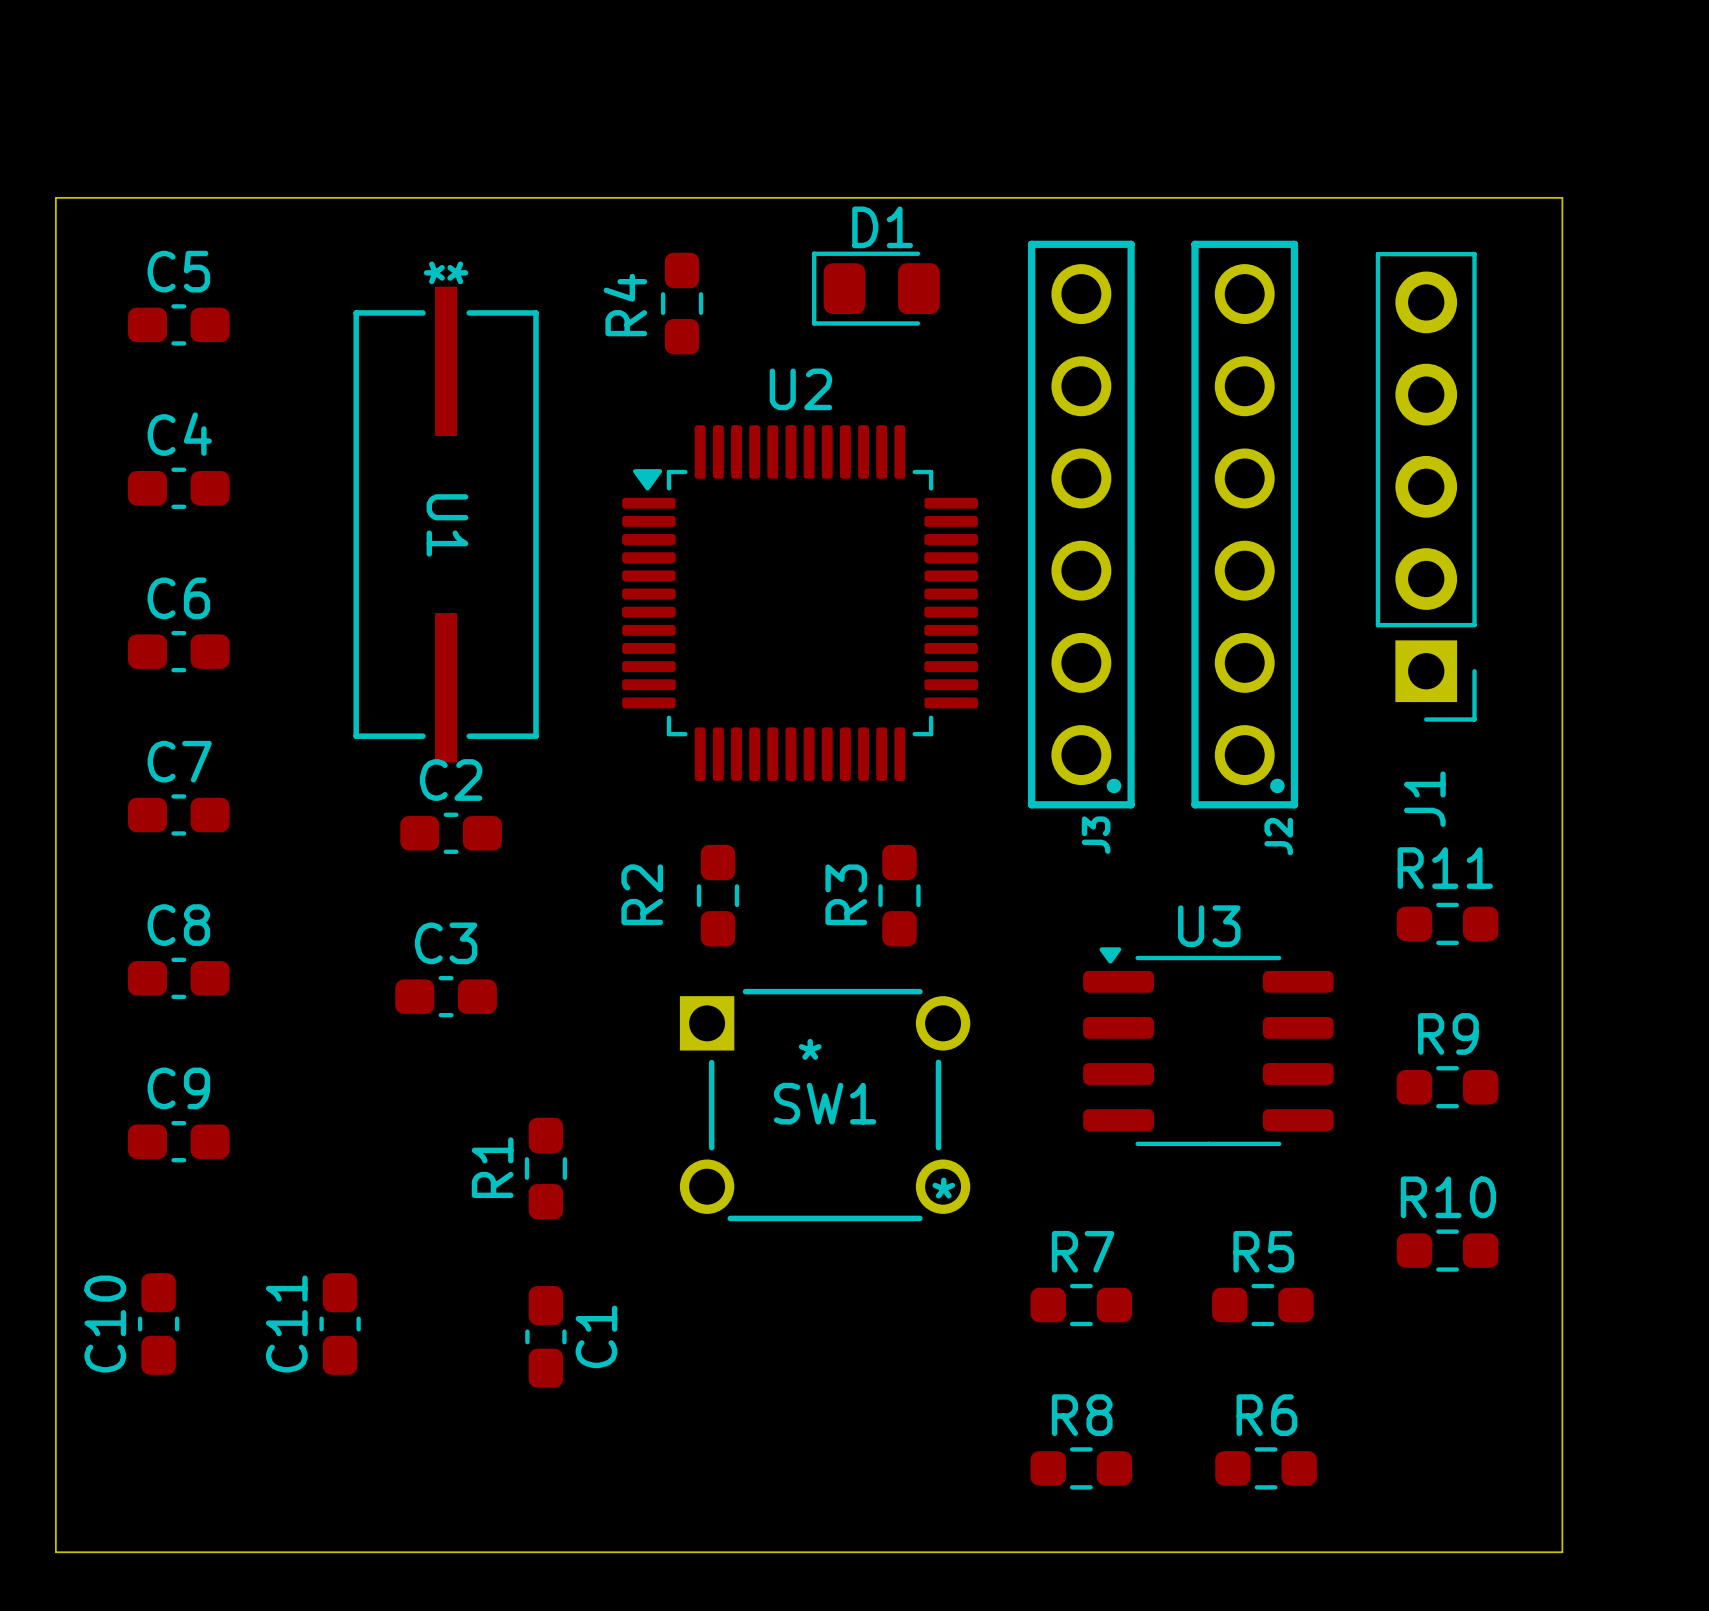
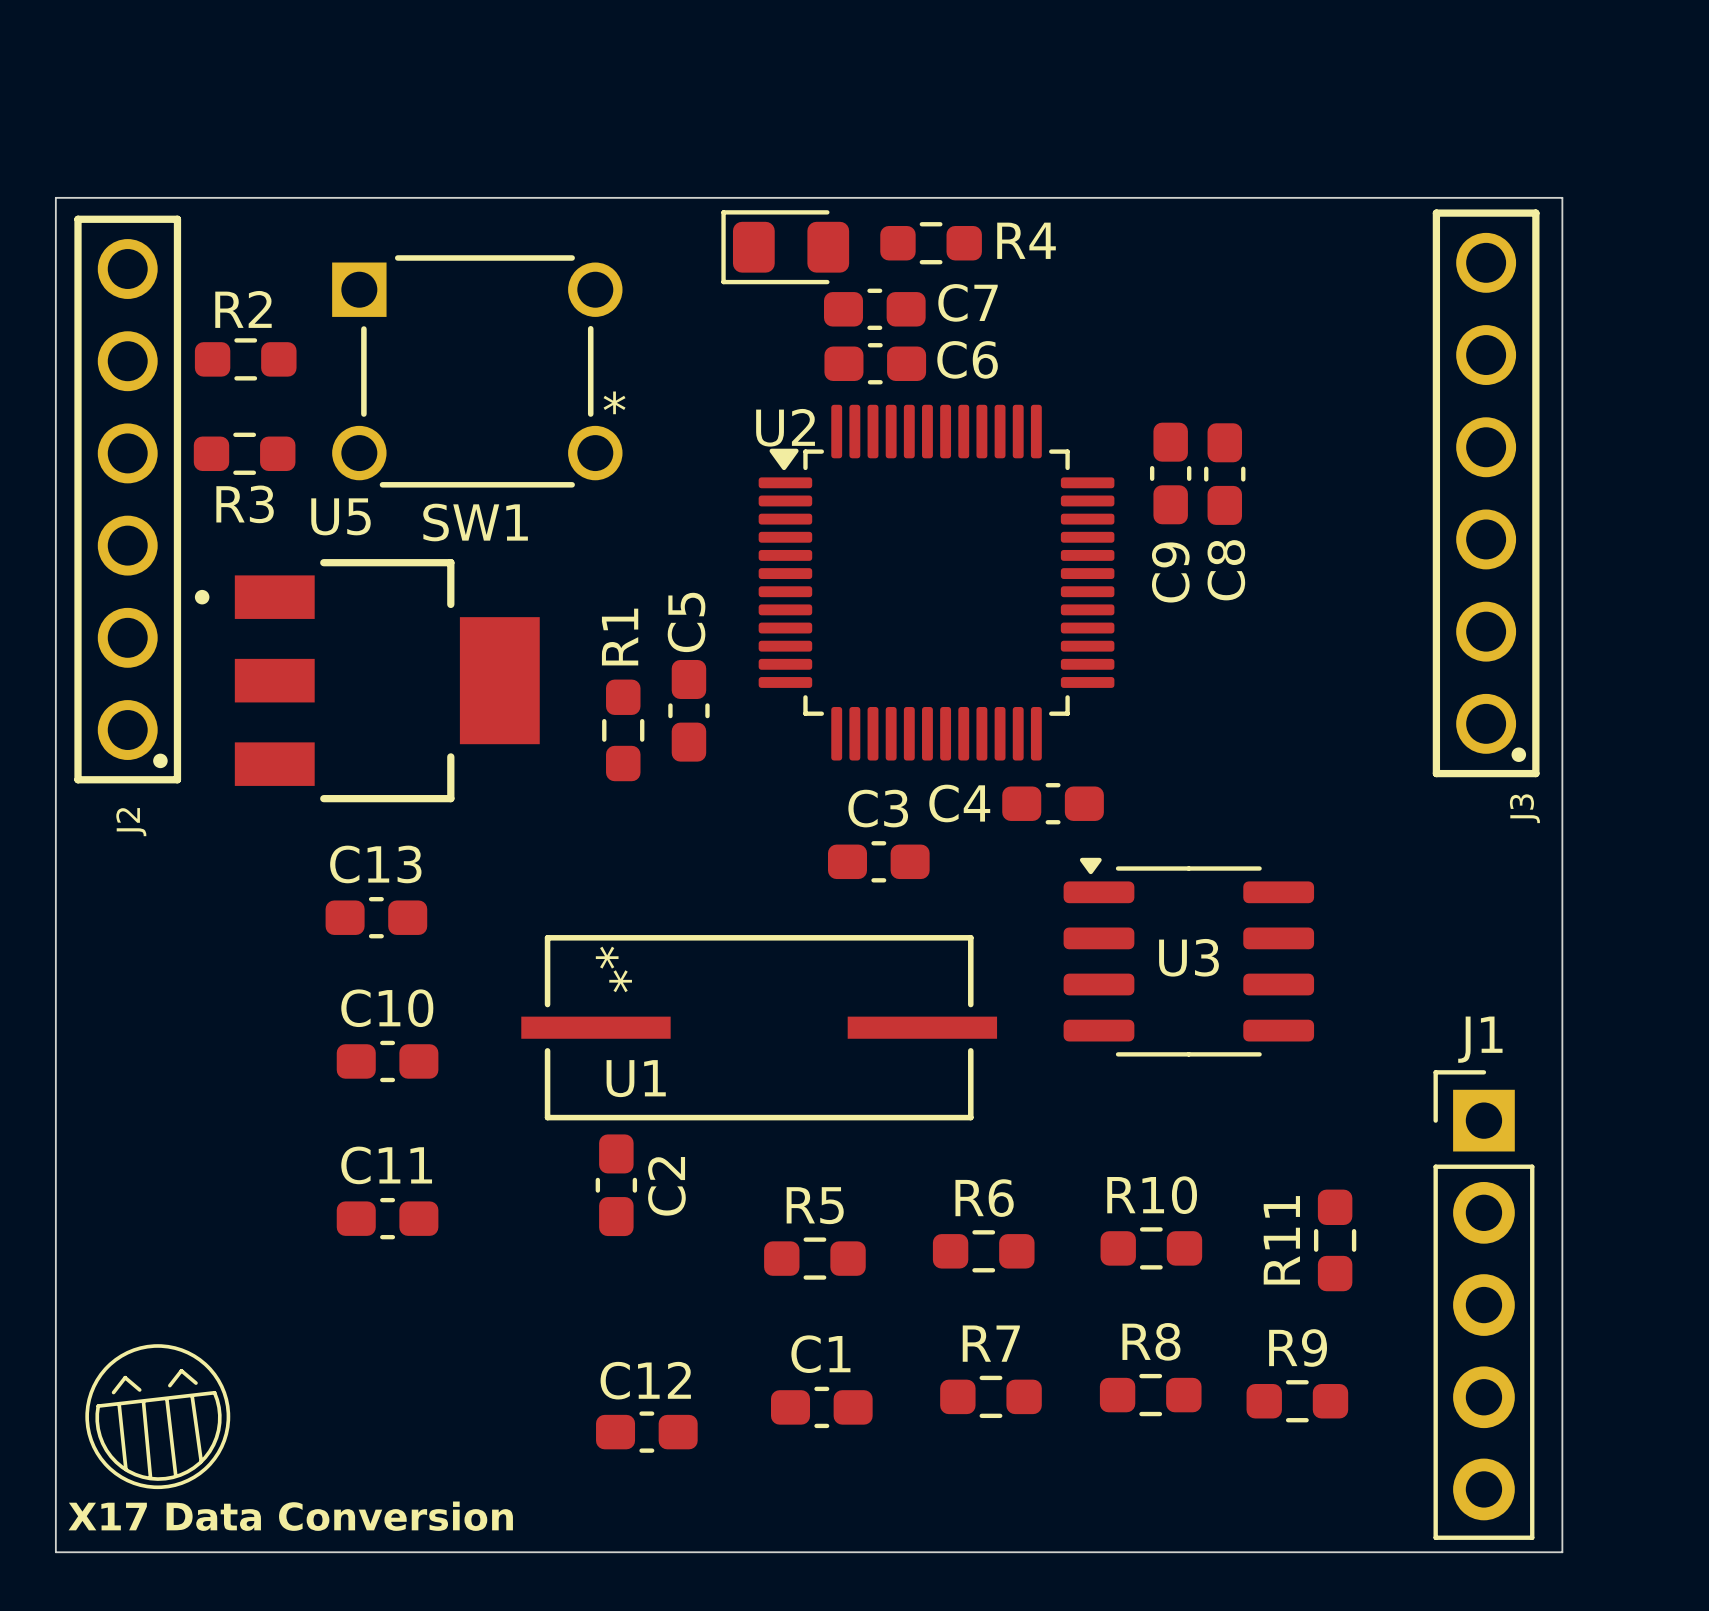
part: none -> (785, 247)
U1 footprint: [353, 286, 539, 763] -> [521, 935, 998, 1121]
D1: (875, 288) -> none
R4 rotation: 0° (682, 303) -> 90° clockwise (931, 243)
R4 position: (682, 303) -> (931, 243)
R4 name position: R4 (625, 305) -> R4 (1026, 240)
C5 rotation: 0° (178, 324) -> 90° clockwise (688, 710)
C5 position: (178, 324) -> (688, 710)
U2 name position: U2 (800, 389) -> U2 (785, 427)
C4 name position: C4 (179, 434) -> C4 (959, 803)
J1 rotation: 0° (1426, 486) -> 180° (1483, 1305)
J1 position: (1426, 486) -> (1483, 1305)
C4 position: (178, 488) -> (1053, 803)
J3 position: (1081, 524) -> (1486, 493)
J2 position: (1244, 524) -> (127, 499)
U1 name position: U1 (447, 525) -> U1 (636, 1078)
C6 name position: C6 (178, 598) -> C6 (967, 359)
U2 position: (800, 603) -> (936, 582)
C6 position: (178, 651) -> (875, 363)
U5: none -> (367, 680)
C7 name position: C7 (179, 761) -> C7 (968, 302)
C7 position: (178, 814) -> (874, 309)
C2 rotation: 0° (451, 833) -> 90° clockwise (616, 1185)
C2 position: (451, 833) -> (616, 1185)
J3 name position: J3 (1096, 835) -> J3 (1524, 808)
J2 name position: J2 (1278, 836) -> J2 (131, 822)
R3 name position: R3 (846, 894) -> R3 (245, 504)
R2 rotation: 0° (718, 895) -> 90° clockwise (245, 359)
R2 position: (718, 895) -> (245, 359)
R3 rotation: 0° (899, 895) -> 90° clockwise (244, 453)
R3 position: (899, 895) -> (244, 453)
C13: none -> (376, 917)
R11 rotation: 0° (1447, 923) -> 90° clockwise (1335, 1240)
R11 position: (1447, 923) -> (1335, 1240)
C8 name position: C8 (178, 925) -> C8 (1226, 570)
U3 name position: U3 (1209, 926) -> U3 (1188, 957)
C8 rotation: 0° (178, 978) -> 90° clockwise (1224, 474)
C8 position: (178, 978) -> (1224, 474)
C3 position: (446, 996) -> (878, 861)
U3 position: (1208, 1046) -> (1188, 957)
SW1 text position: * (810, 1049) -> * (614, 402)
R9 position: (1447, 1087) -> (1297, 1401)
C9 name position: C9 (178, 1088) -> C9 (1170, 572)
SW1 name position: SW1 (825, 1103) -> SW1 (475, 522)
SW1 position: (825, 1105) -> (477, 371)
C9 rotation: 0° (178, 1141) -> 90° clockwise (1170, 473)
C9 position: (178, 1141) -> (1170, 473)
R1 name position: R1 (492, 1167) -> R1 (620, 637)
R1 position: (545, 1168) -> (623, 730)
SW1 text: * (943, 1188) -> none
R10 position: (1447, 1250) -> (1151, 1248)
R7 position: (1081, 1305) -> (990, 1396)
R5 position: (1262, 1305) -> (814, 1258)
C10 rotation: 0° (158, 1324) -> 90° clockwise (387, 1061)
C10 position: (158, 1324) -> (387, 1061)
C11 rotation: 0° (340, 1324) -> 90° clockwise (387, 1218)
C11 position: (340, 1324) -> (387, 1218)
C1 rotation: 0° (545, 1336) -> 90° clockwise (821, 1407)
C1 position: (545, 1336) -> (821, 1407)
C1 name position: C1 (596, 1336) -> C1 (820, 1354)
drawing: none -> [85, 1344, 231, 1490]
line: none -> (195, 1383) (181, 1370) (169, 1385)
line: none -> (139, 1389) (125, 1377) (113, 1392)
line: none -> (214, 1392) (98, 1406) (98, 1428) (102, 1443) (116, 1462) (135, 1474) (150, 1478) (165, 1478) (187, 1471) (205, 1457) (216, 1437) (219, 1415) (214, 1392)
line: none -> (192, 1396) (201, 1461)
line: none -> (166, 1399) (175, 1474)
line: none -> (143, 1402) (150, 1476)
line: none -> (119, 1404) (125, 1469)
C12: none -> (646, 1432)
R8 position: (1081, 1468) -> (1150, 1395)
R6 position: (1266, 1468) -> (983, 1251)
text: none -> X17 Data Conversion (290, 1516)

